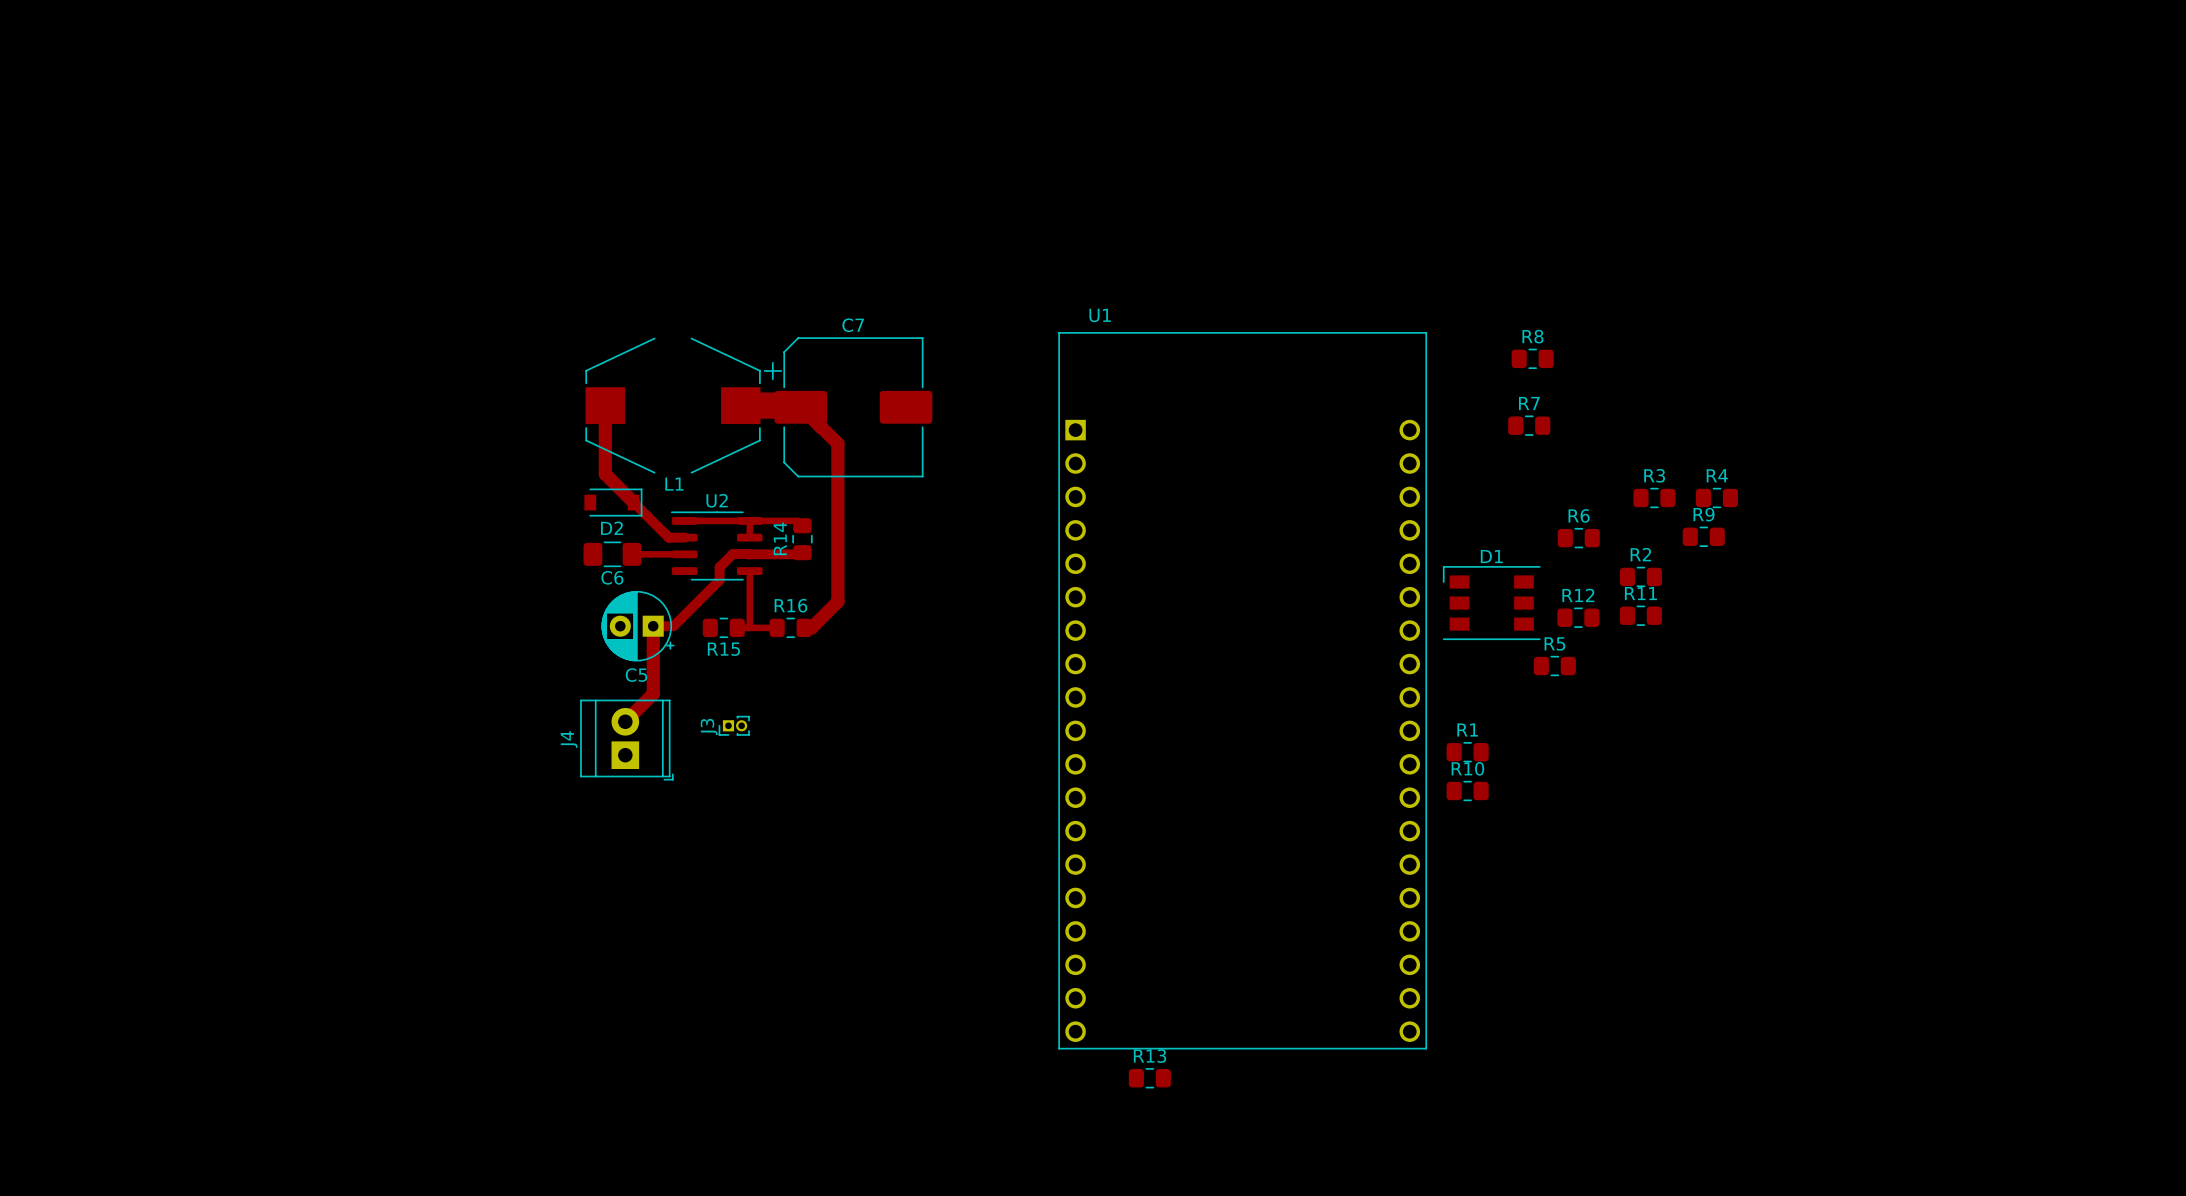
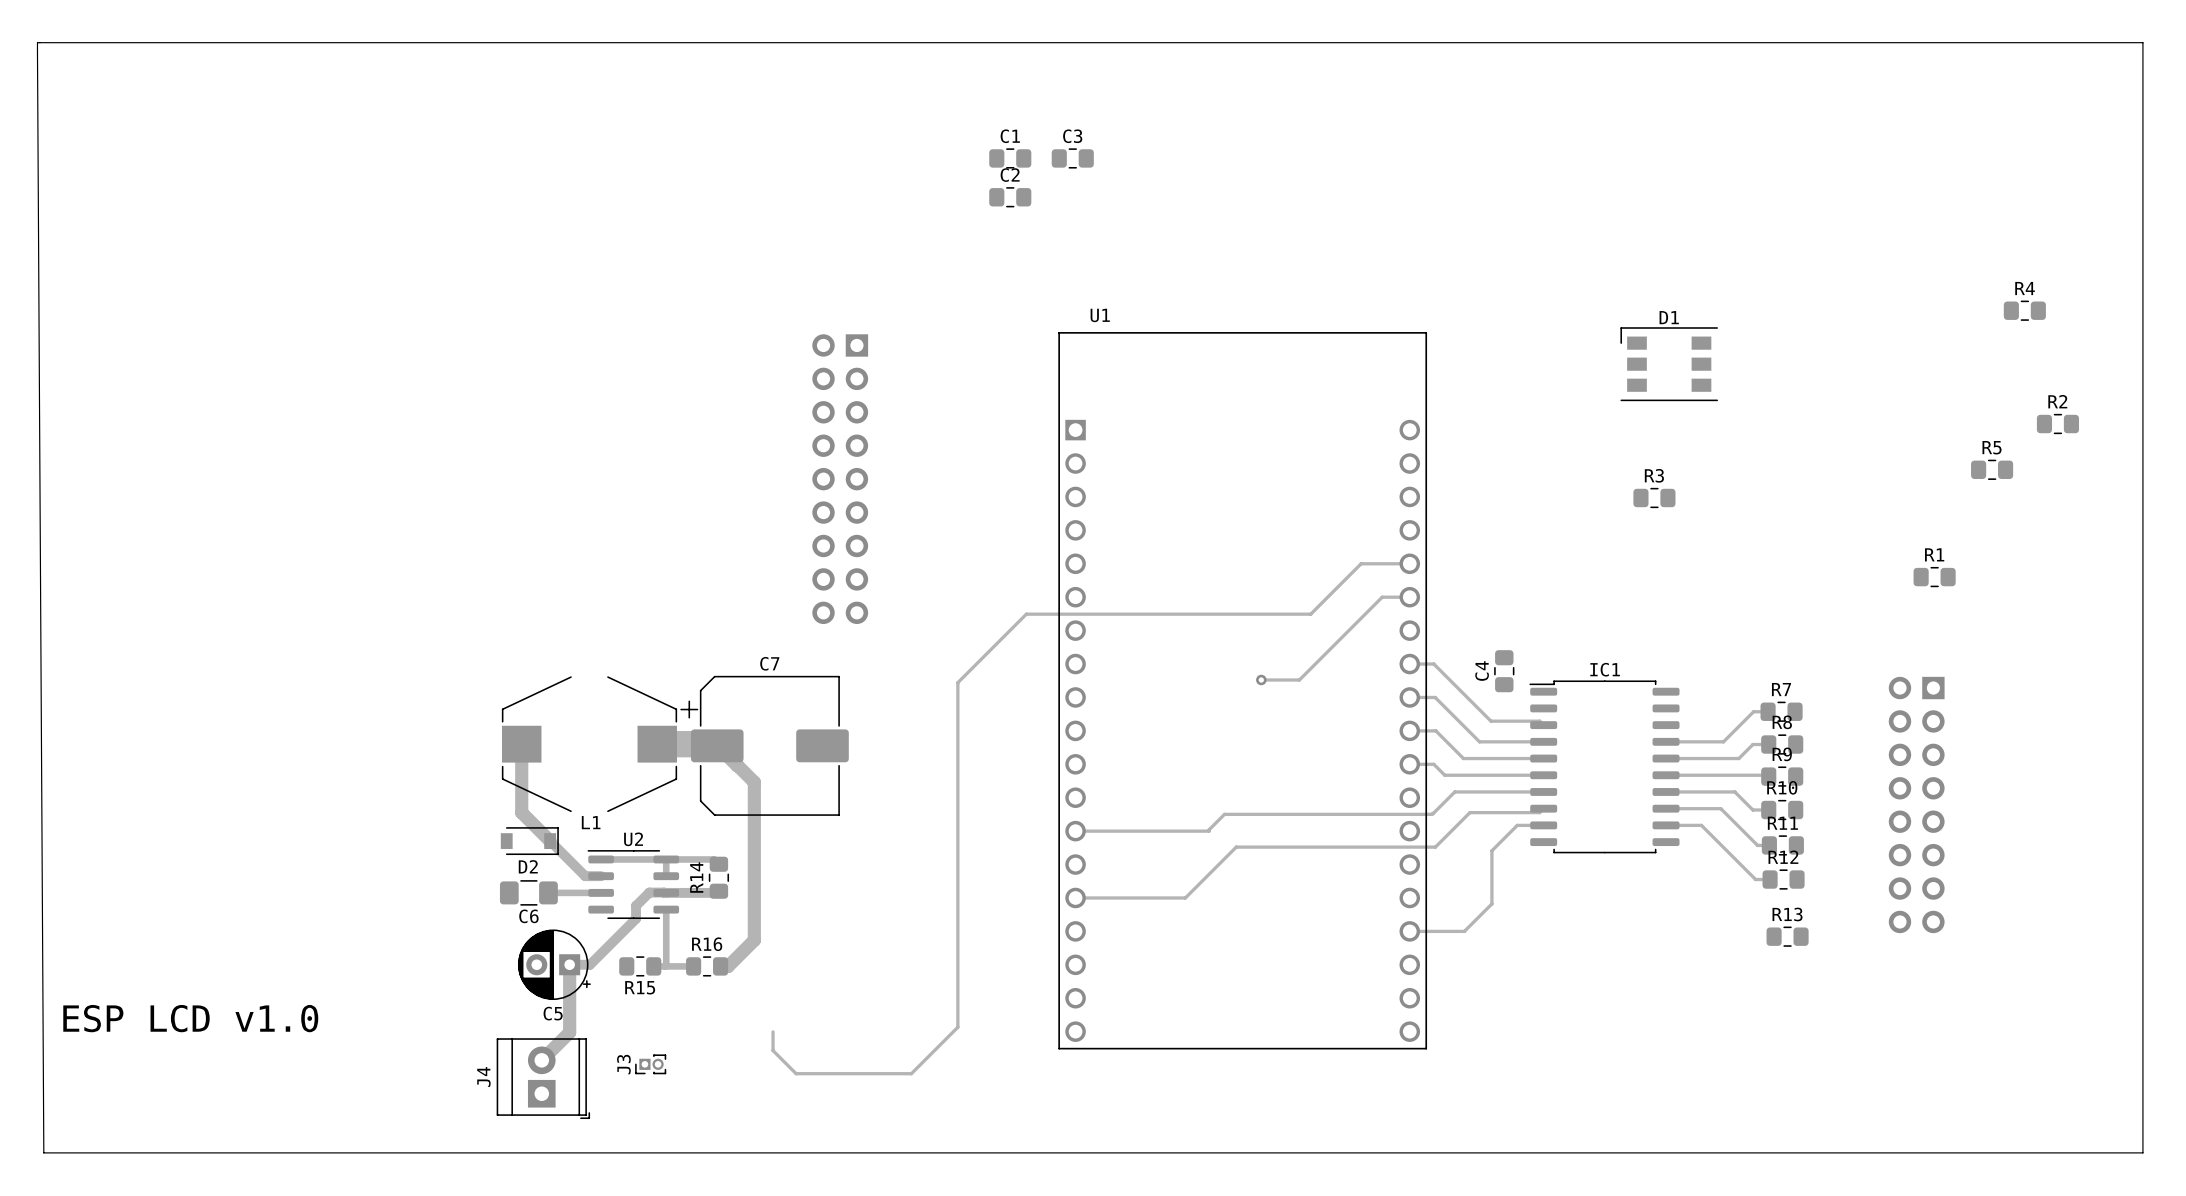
board edge: none -> (37, 42) (2142, 42) (2142, 1152) (43, 1152) (37, 42)
C1: none -> (1010, 158)
C3: none -> (1072, 158)
C2: none -> (1010, 197)
R8 position: (1532, 358) -> (1782, 744)
track: (605, 405) (605, 474) (668, 537) (684, 537) -> none
L1 position: (673, 405) -> (589, 744)
track: (740, 405) (799, 405) (837, 443) (837, 601) (811, 627) (804, 627) -> none
C7 position: (848, 407) -> (764, 745)
R7 position: (1529, 425) -> (1781, 711)
part: none -> (840, 479)
R4 position: (1716, 497) -> (2024, 310)
D2 position: (613, 502) -> (529, 841)
track: (684, 520) (797, 520) (802, 525) -> none
track: (749, 520) (749, 537) -> none
R9 position: (1703, 536) -> (1782, 776)
R6: (1578, 538) -> none
R14 position: (802, 539) -> (718, 877)
U2 position: (716, 545) -> (633, 884)
track: (802, 552) (800, 554) (732, 554) (719, 567) (719, 580) (673, 626) (653, 626) (653, 693) (625, 721) -> none
C6 position: (612, 554) -> (528, 892)
track: (632, 554) (684, 554) -> none
track: none -> (1409, 563) (1361, 563) (1310, 614) (1026, 614) (957, 682) (957, 1027) (911, 1073) (796, 1073) (773, 1050) (773, 1031)
track: (749, 571) (748, 627) -> none
R2 position: (1640, 576) -> (2057, 424)
track: none -> (1409, 597) (1382, 597) (1299, 680) (1261, 680)
D1 position: (1491, 603) -> (1669, 364)
R11 position: (1640, 615) -> (1782, 845)
R12 position: (1578, 617) -> (1783, 879)
C5 position: (637, 626) -> (554, 964)
R15 position: (723, 627) -> (640, 966)
track: (737, 627) (777, 627) -> none
R16 position: (790, 627) -> (707, 966)
track: none -> (1409, 664) (1433, 664) (1490, 721) (1539, 721) (1543, 725)
R5 position: (1554, 666) -> (1992, 469)
C4: none -> (1504, 671)
via: none -> (1261, 680)
track: none -> (1409, 697) (1435, 697) (1479, 741) (1543, 741)
track: none -> (1768, 711) (1753, 711) (1723, 741) (1666, 741)
J3 position: (734, 725) -> (650, 1064)
track: none -> (1409, 730) (1435, 730) (1463, 758) (1543, 758)
J4 position: (626, 740) -> (543, 1078)
track: none -> (521, 744) (521, 812) (585, 876) (601, 876)
track: none -> (657, 744) (715, 744) (754, 782) (754, 940) (728, 966) (720, 966)
track: none -> (1768, 744) (1752, 744) (1738, 758) (1666, 758)
R1 position: (1467, 752) -> (1934, 577)
track: none -> (1409, 764) (1433, 764) (1444, 775) (1543, 775)
IC1: none -> (1604, 766)
track: none -> (1666, 775) (1768, 776)
R10 position: (1467, 791) -> (1782, 810)
track: none -> (1543, 791) (1454, 791) (1432, 814) (1224, 814) (1209, 831) (1075, 831)
track: none -> (1666, 791) (1734, 791) (1752, 810) (1768, 810)
part: none -> (1916, 805)
track: none -> (1543, 808) (1539, 812) (1469, 812) (1435, 847) (1236, 847) (1185, 897) (1075, 897)
track: none -> (1666, 808) (1720, 808) (1757, 845) (1769, 845)
track: none -> (1543, 825) (1517, 825) (1491, 850) (1491, 903) (1464, 931) (1409, 931)
track: none -> (1666, 825) (1701, 825) (1755, 879) (1770, 879)
track: none -> (601, 859) (714, 859) (718, 864)
track: none -> (666, 859) (666, 876)
track: none -> (718, 891) (717, 892) (649, 892) (636, 905) (636, 918) (590, 964) (569, 964) (569, 1032) (541, 1060)
track: none -> (548, 892) (601, 892)
track: none -> (666, 909) (665, 966)
track: none -> (653, 966) (693, 966)
text: none -> ESP LCD v1.0 (190, 1018)
R13 position: (1149, 1078) -> (1787, 936)

